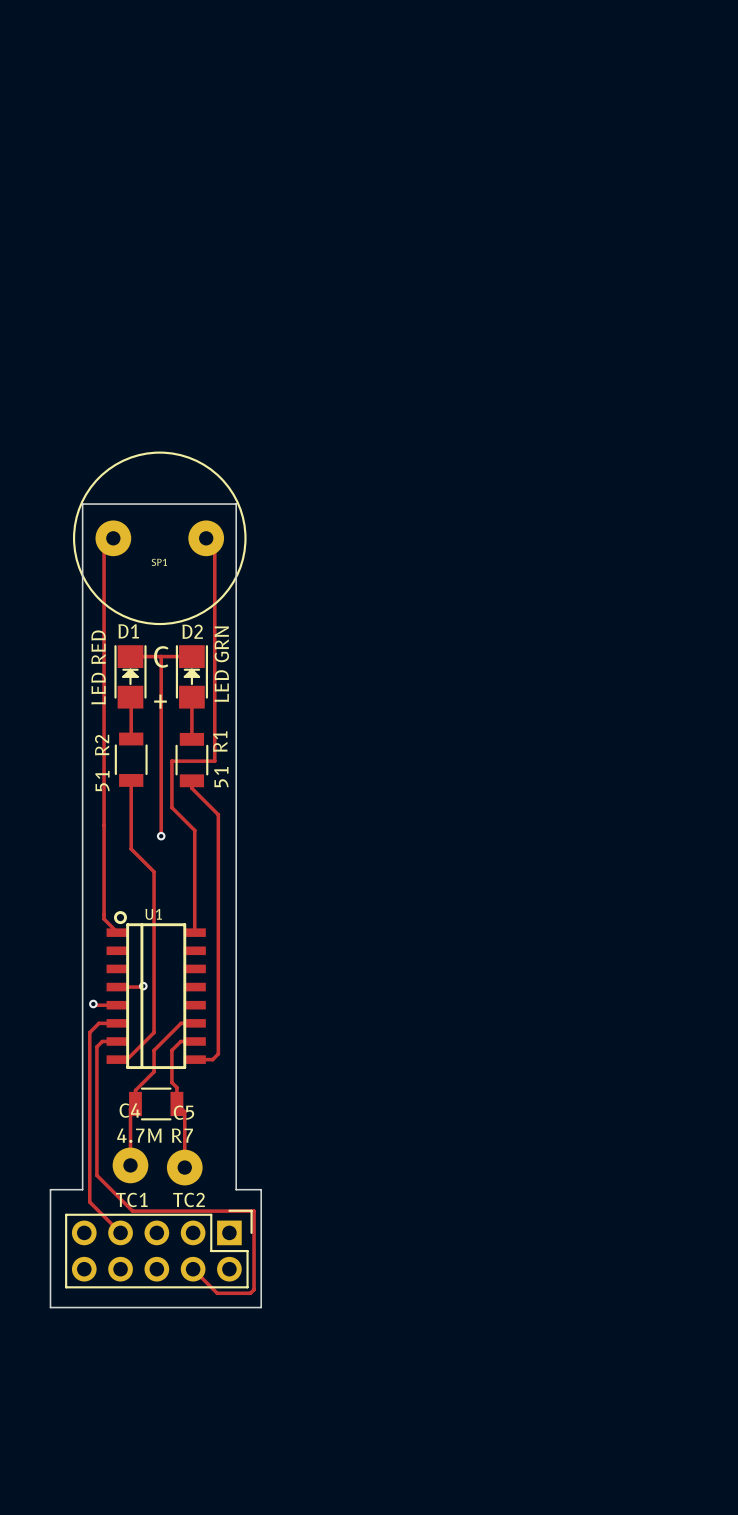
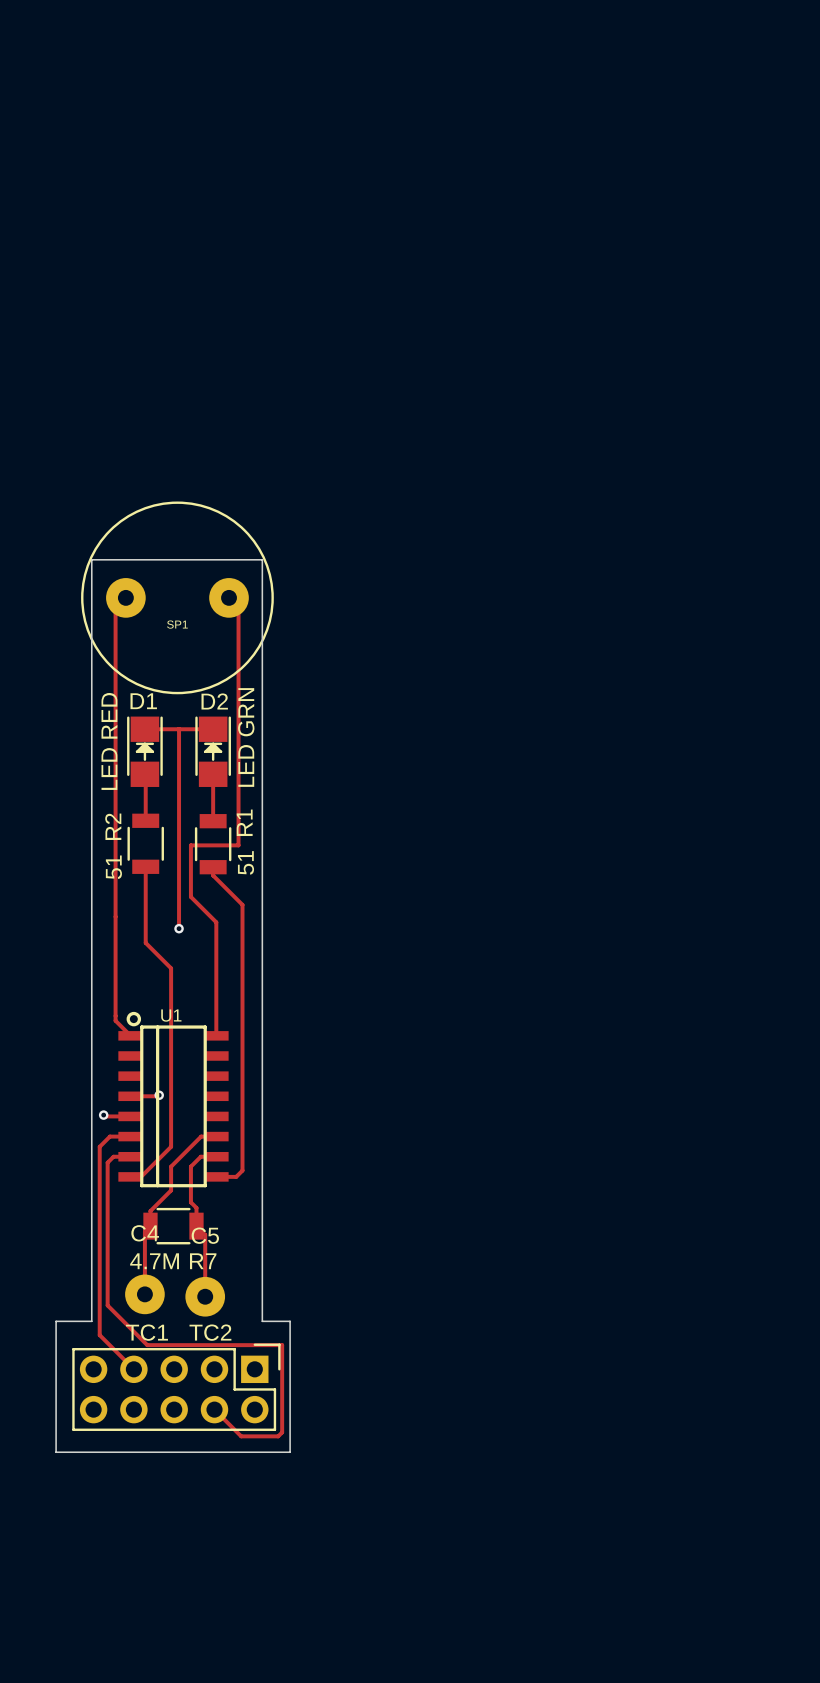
text: C (161, 656) -> none
text: + (160, 701) -> none

